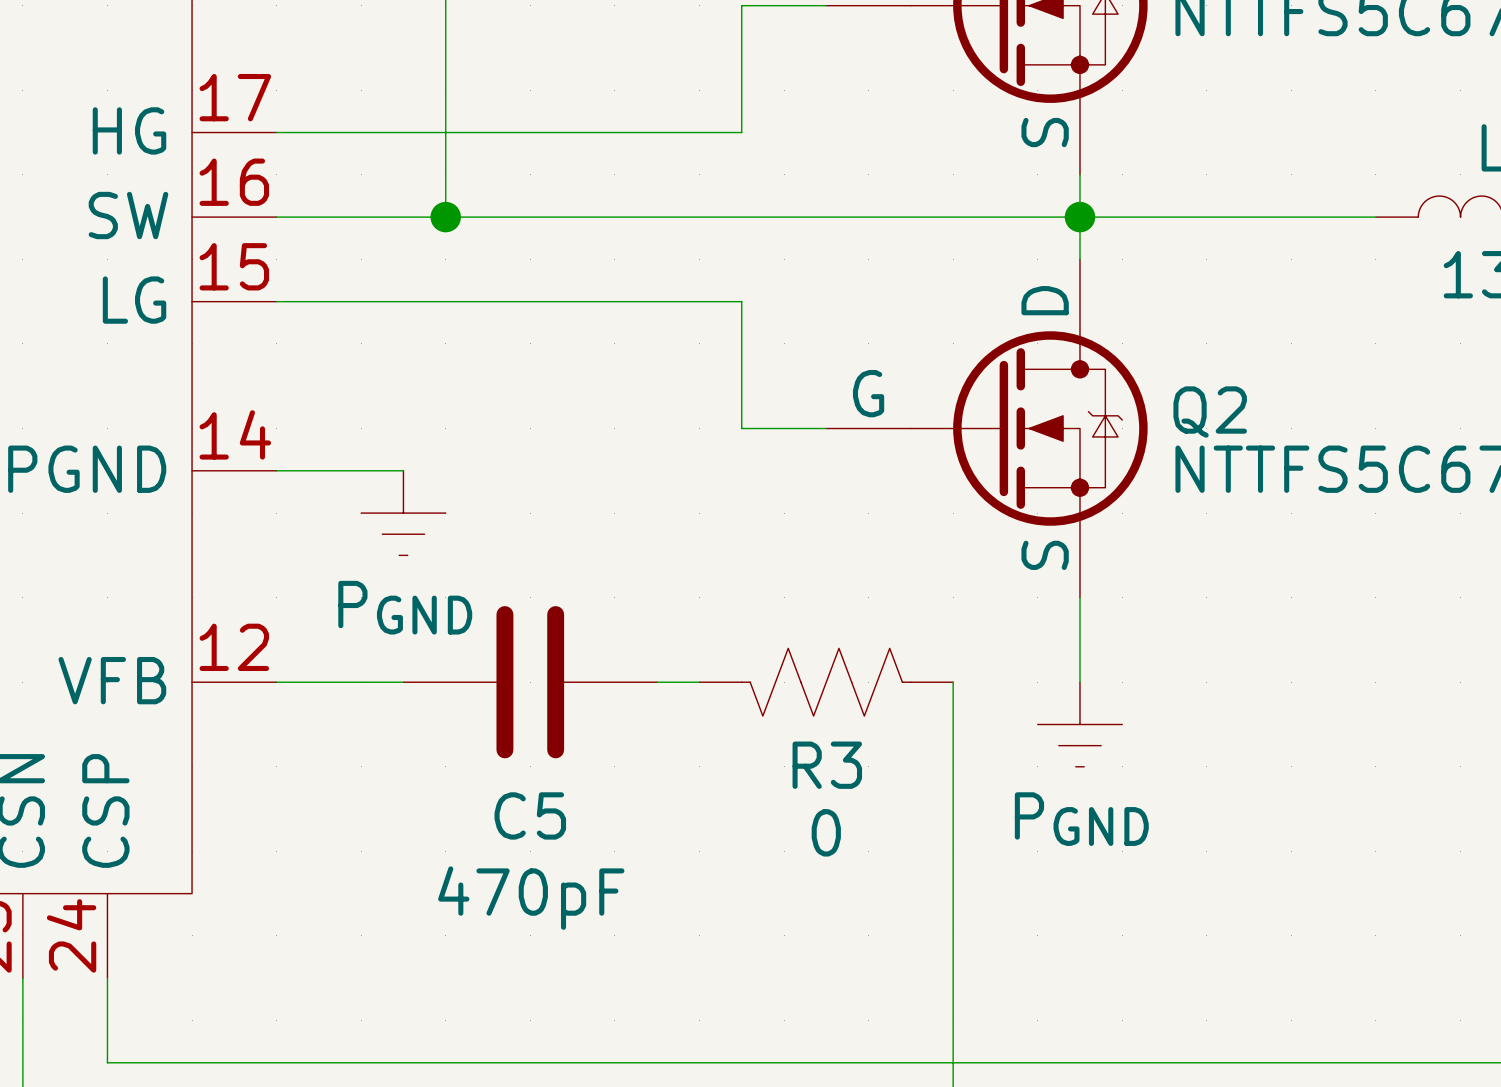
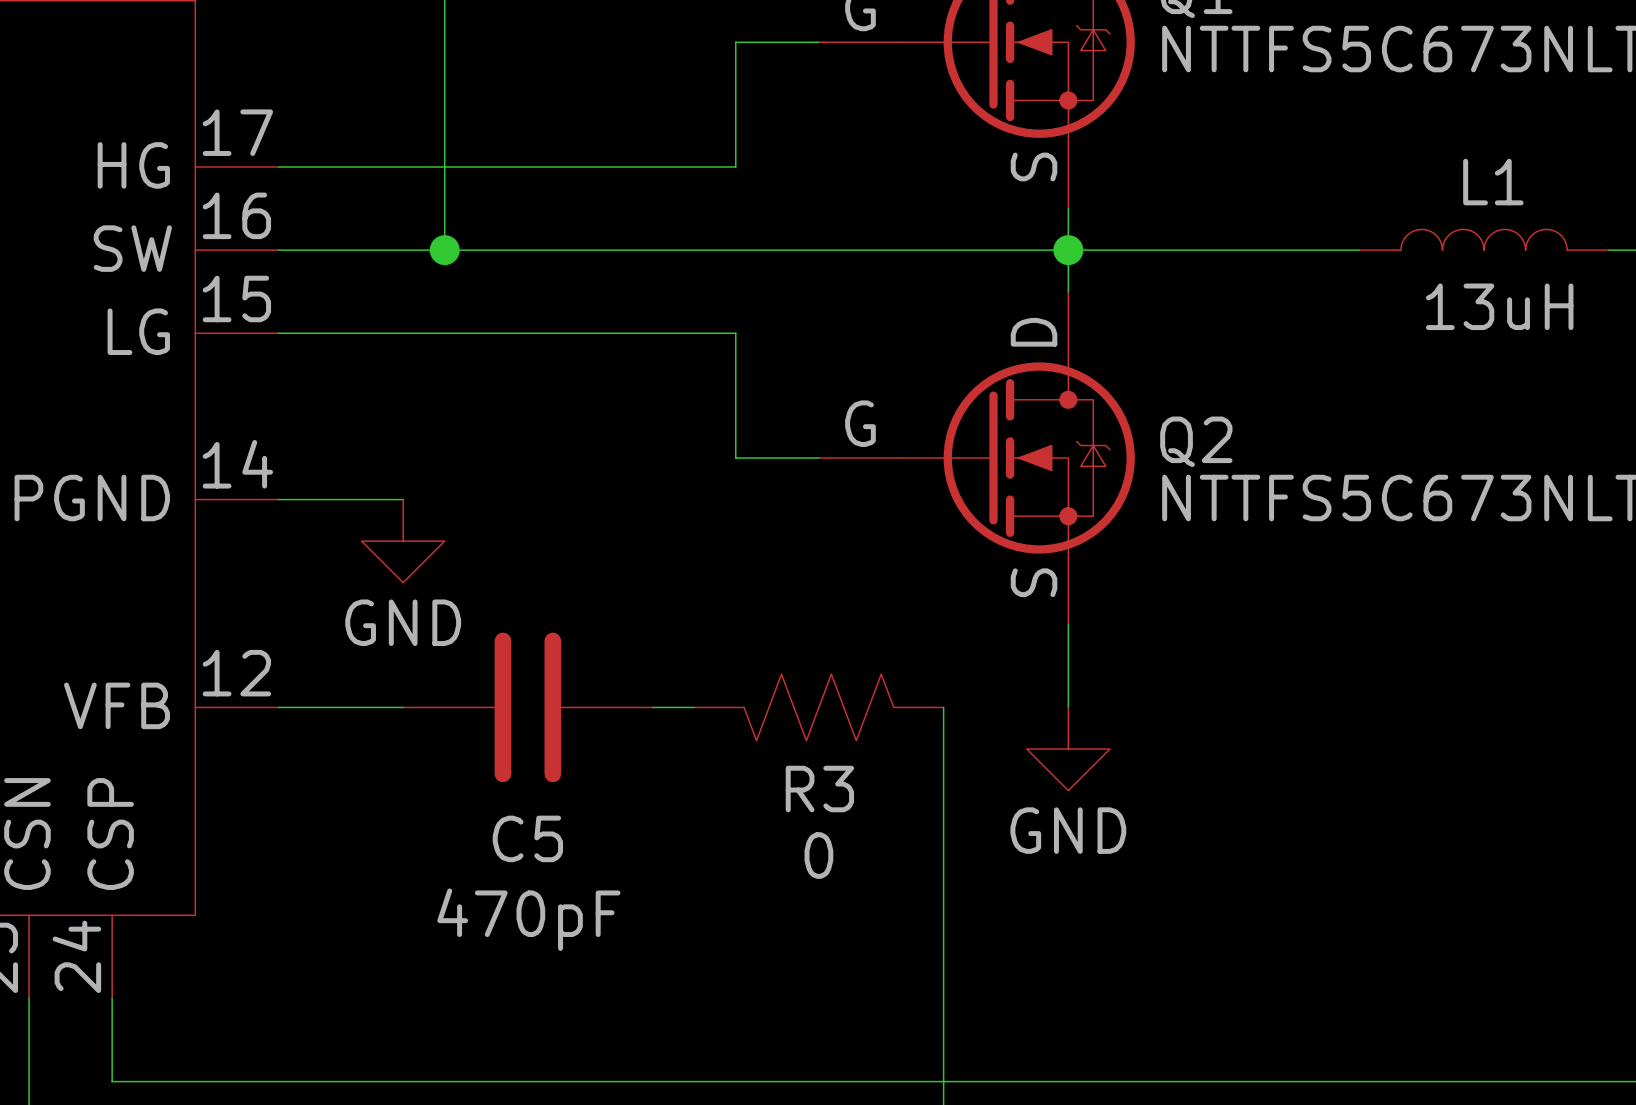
power symbol: PGND (403, 513) -> GND (403, 541)
power symbol: PGND (1079, 724) -> GND (1068, 749)

